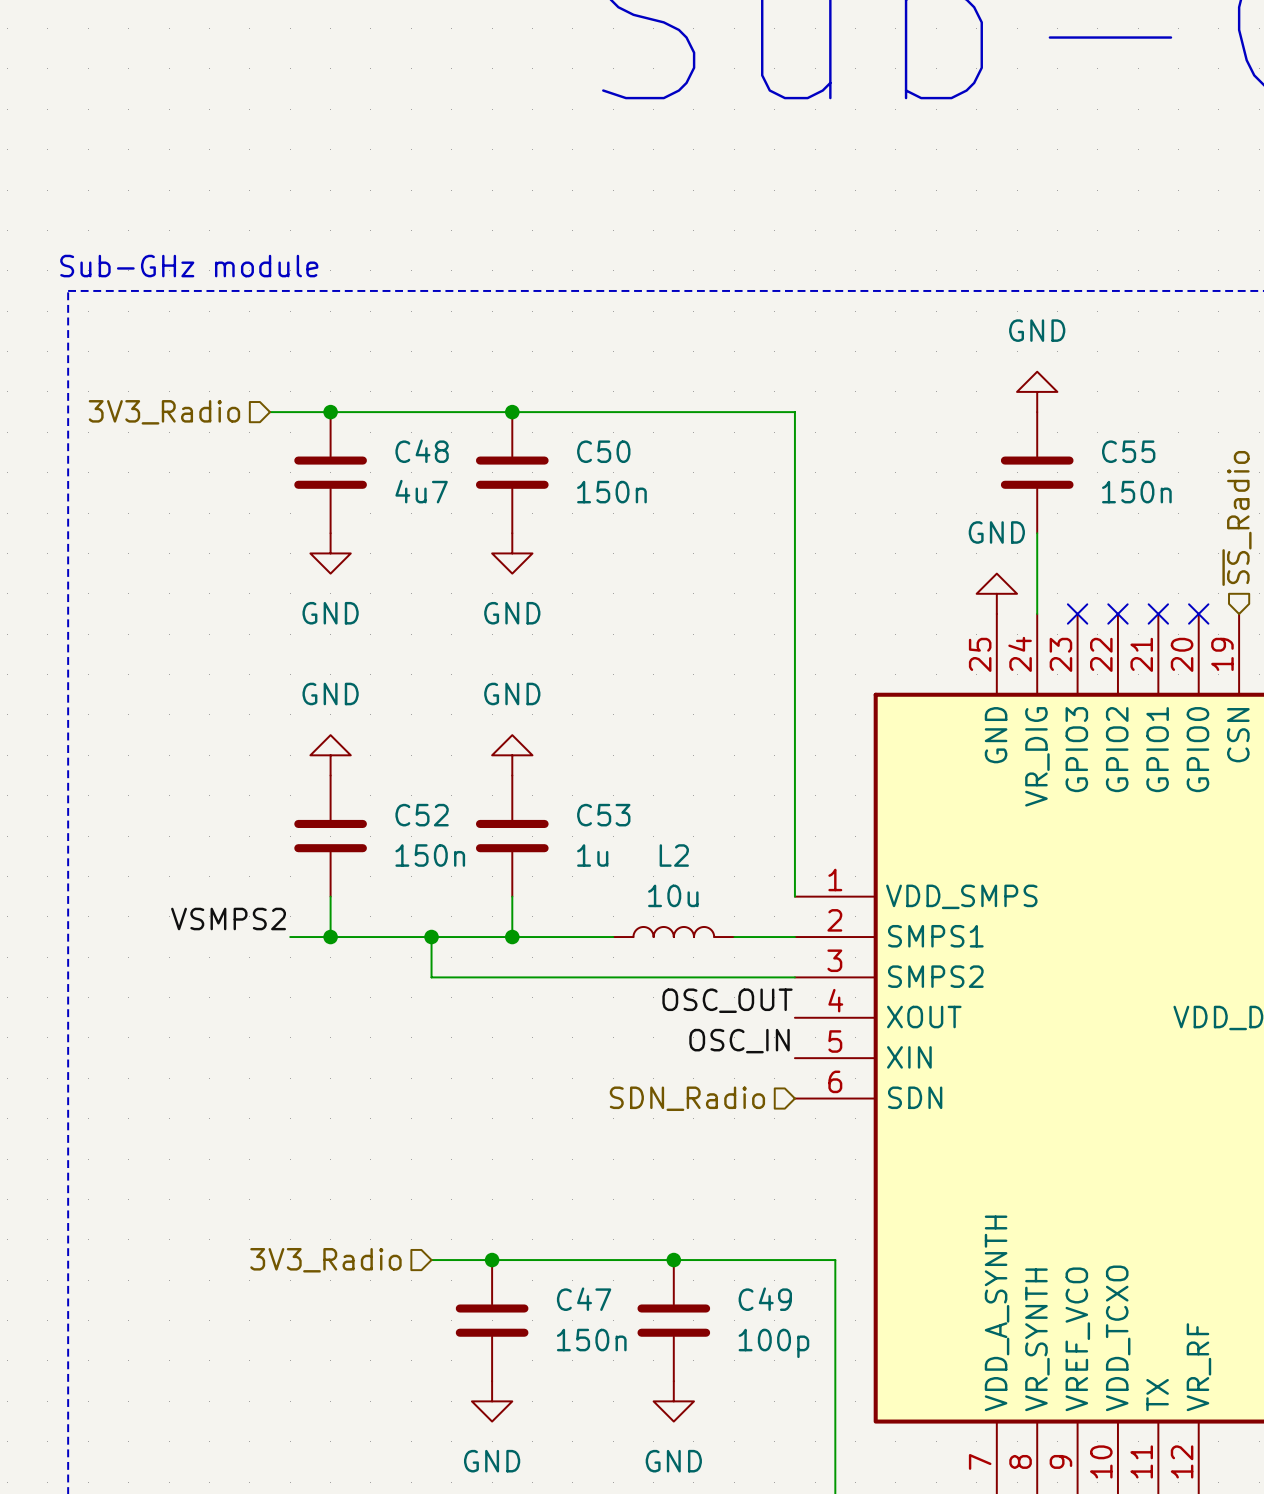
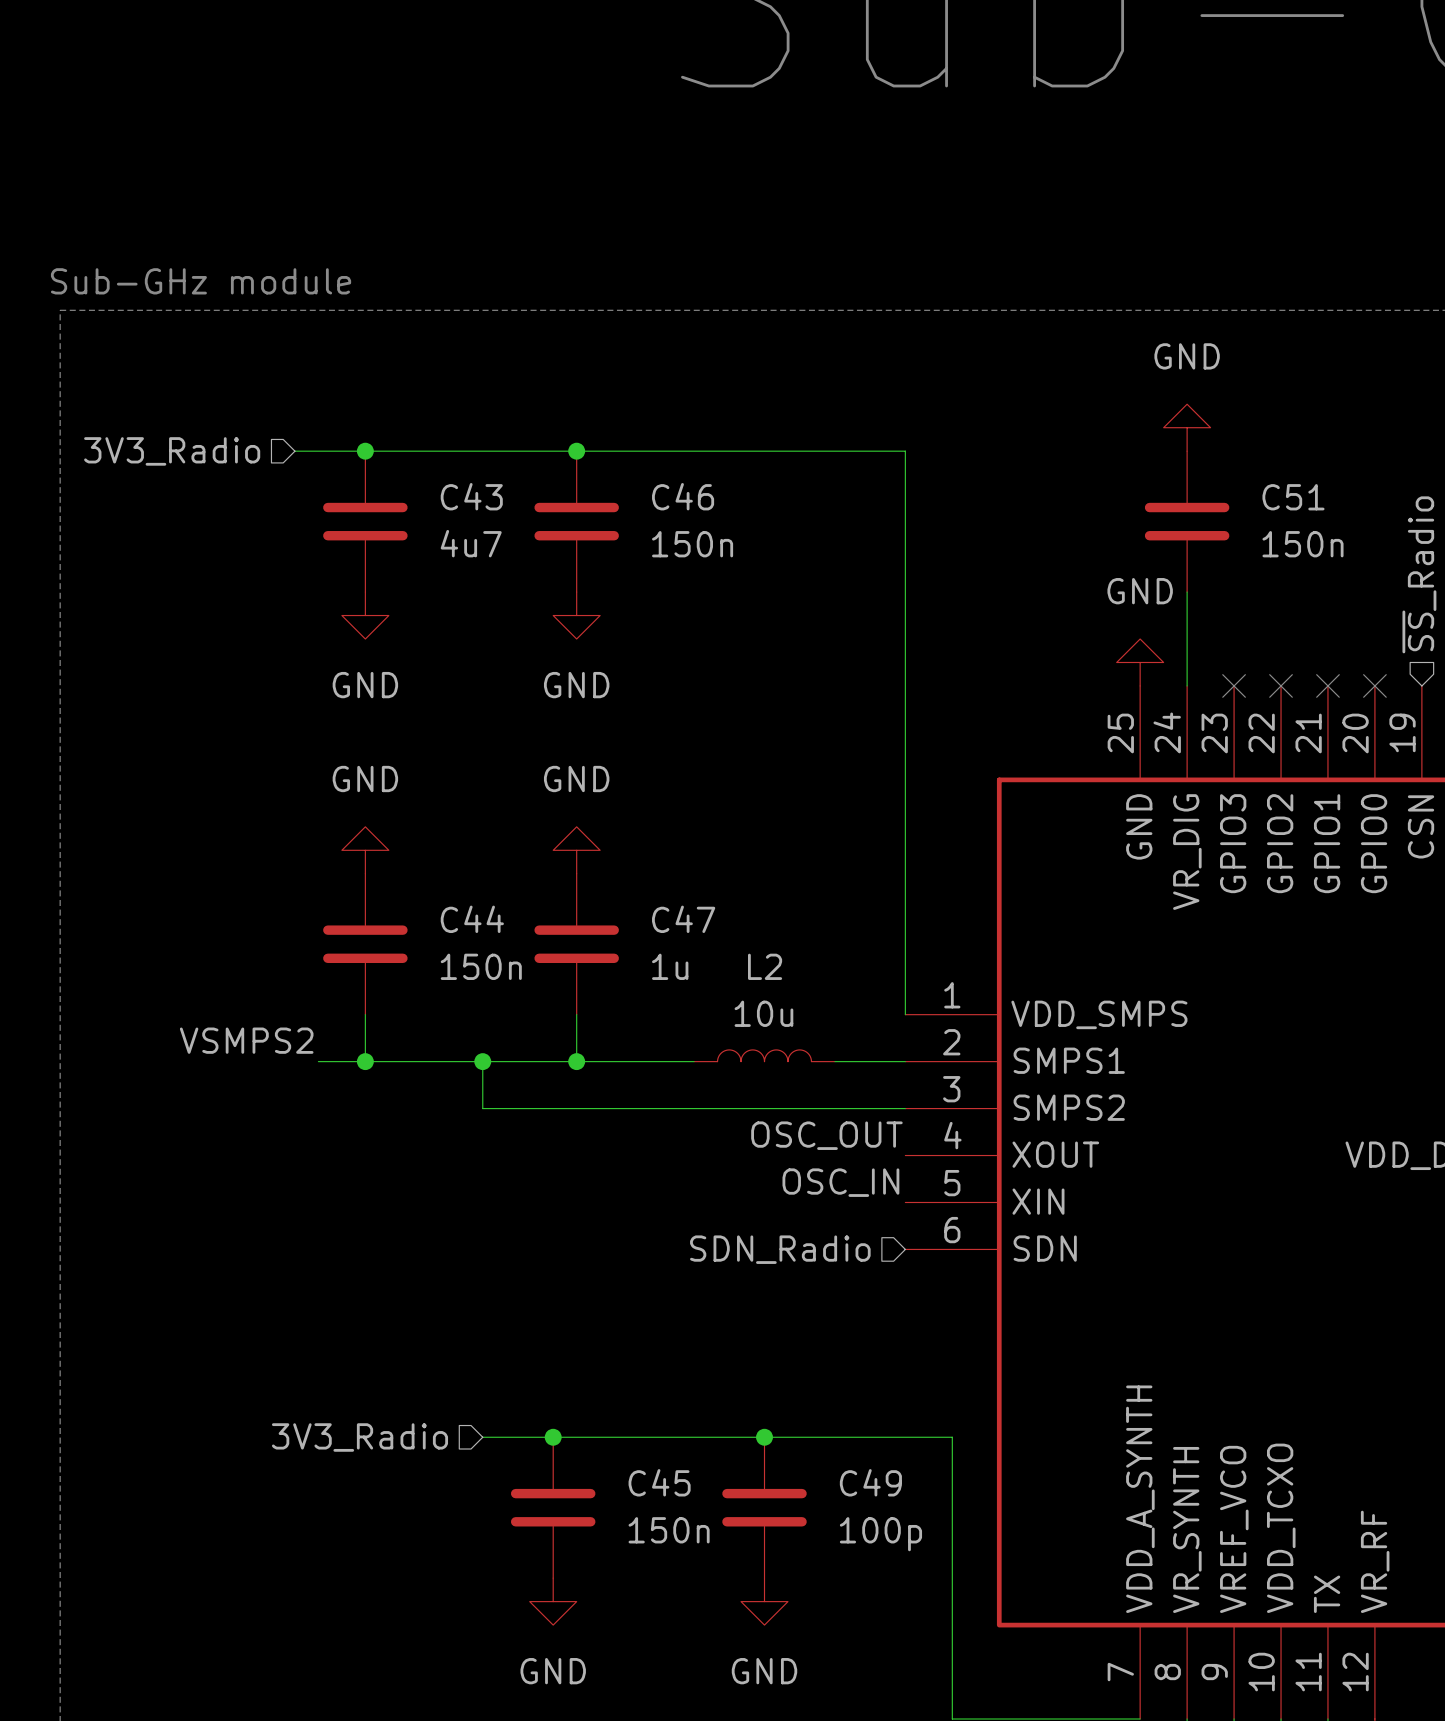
C48 name: C48 (422, 451) -> C43 (471, 496)
C50 name: C50 (603, 451) -> C46 (683, 496)
C55 name: C55 (1128, 451) -> C51 (1293, 497)
C52 name: C52 (422, 815) -> C44 (472, 919)
C53 name: C53 (603, 815) -> C47 (683, 919)
C47 name: C47 (584, 1299) -> C45 (659, 1482)

